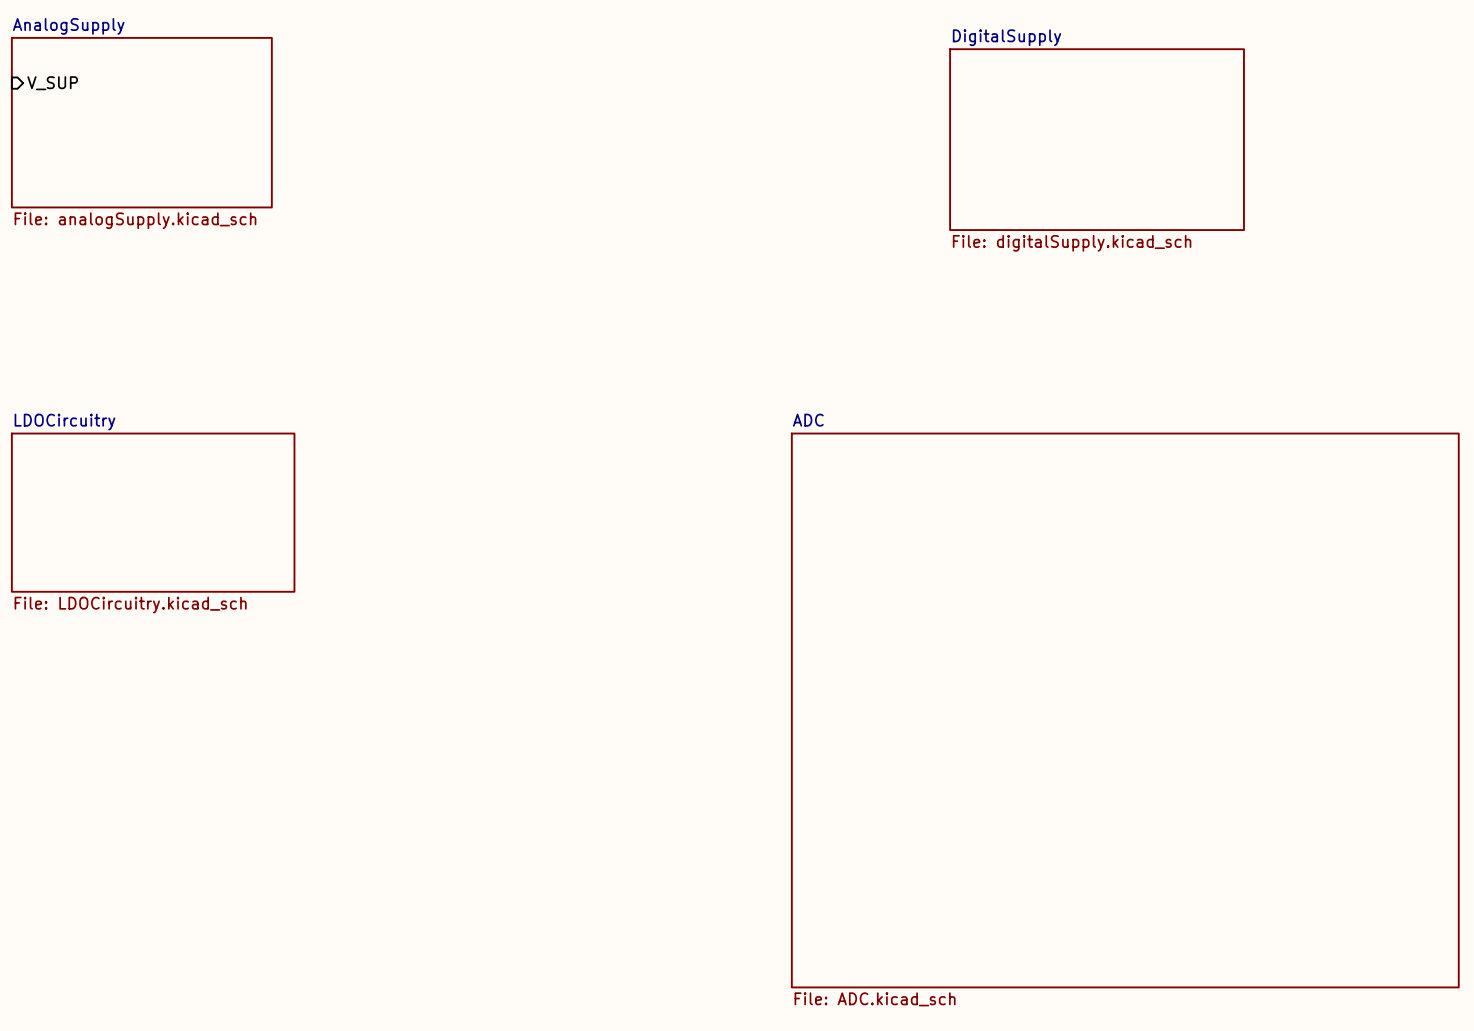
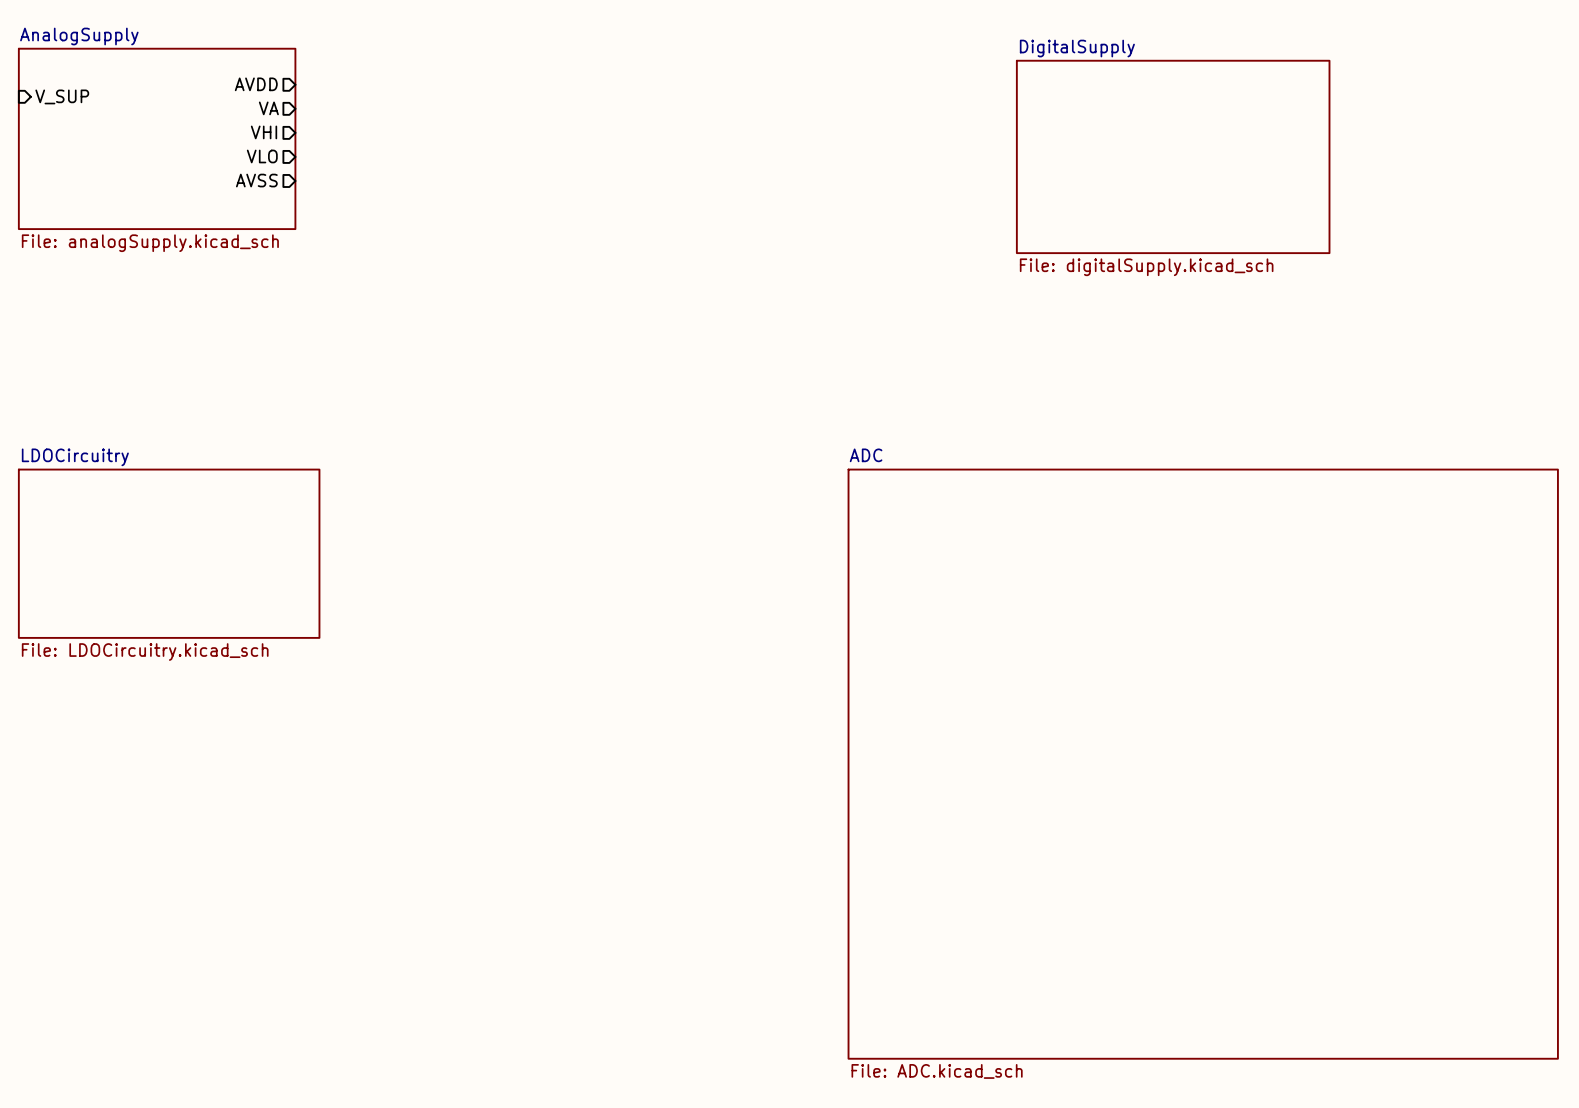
sheet pin: none -> AVDD (256, 84)
sheet pin: none -> VA (268, 108)
sheet pin: none -> VHI (264, 132)
sheet pin: none -> VLO (262, 156)
sheet pin: none -> AVSS (256, 180)

